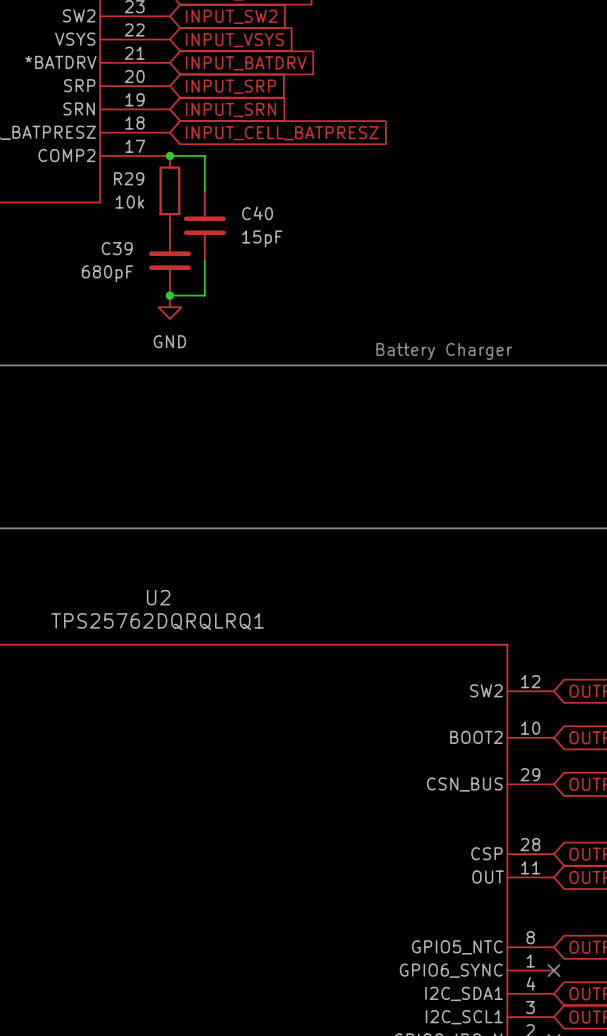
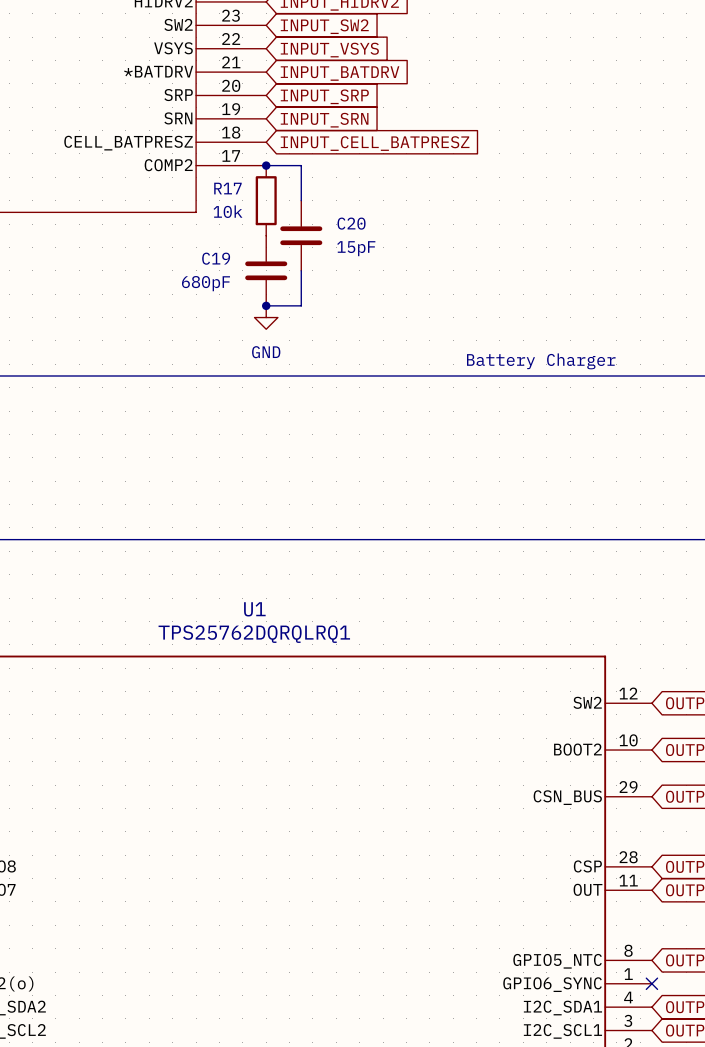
R29 name: R29 (129, 178) -> R17 (227, 188)
C40 name: C40 (257, 213) -> C20 (351, 223)
C39 name: C39 (117, 248) -> C19 (216, 258)
U2 name: U2 (158, 597) -> U1 (254, 609)

